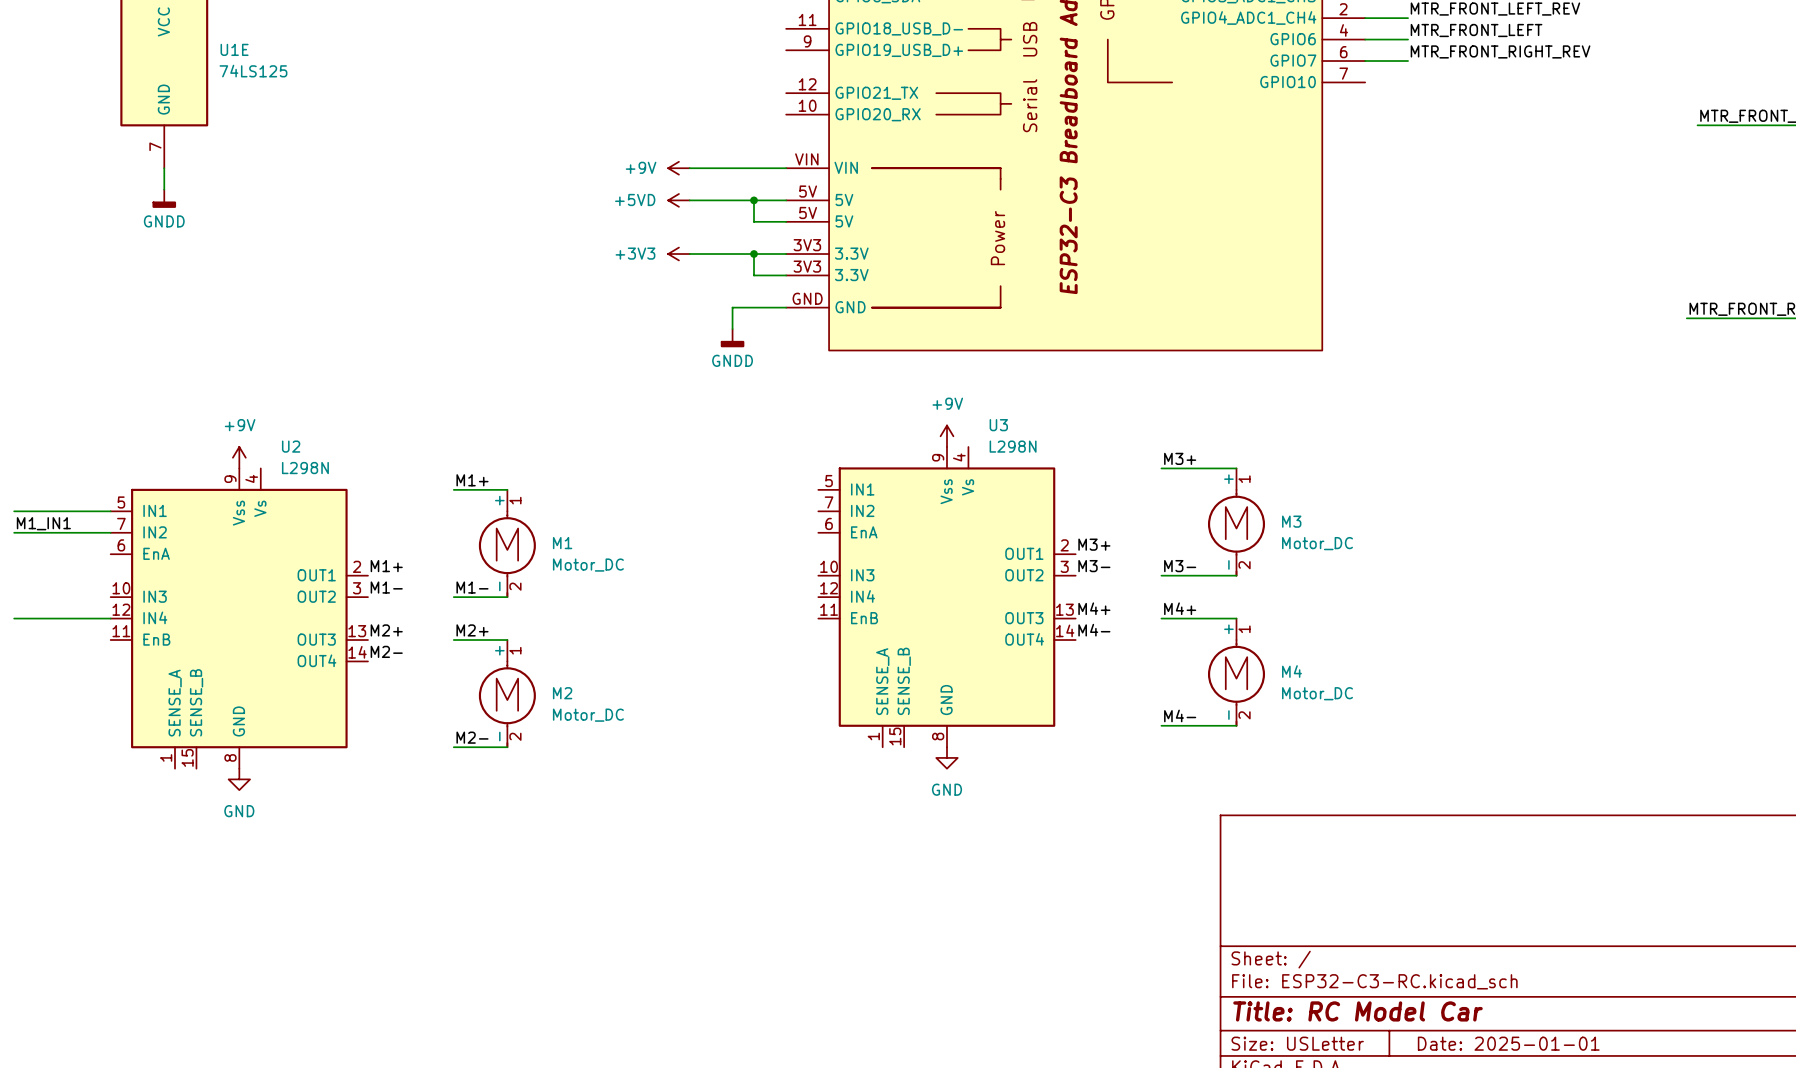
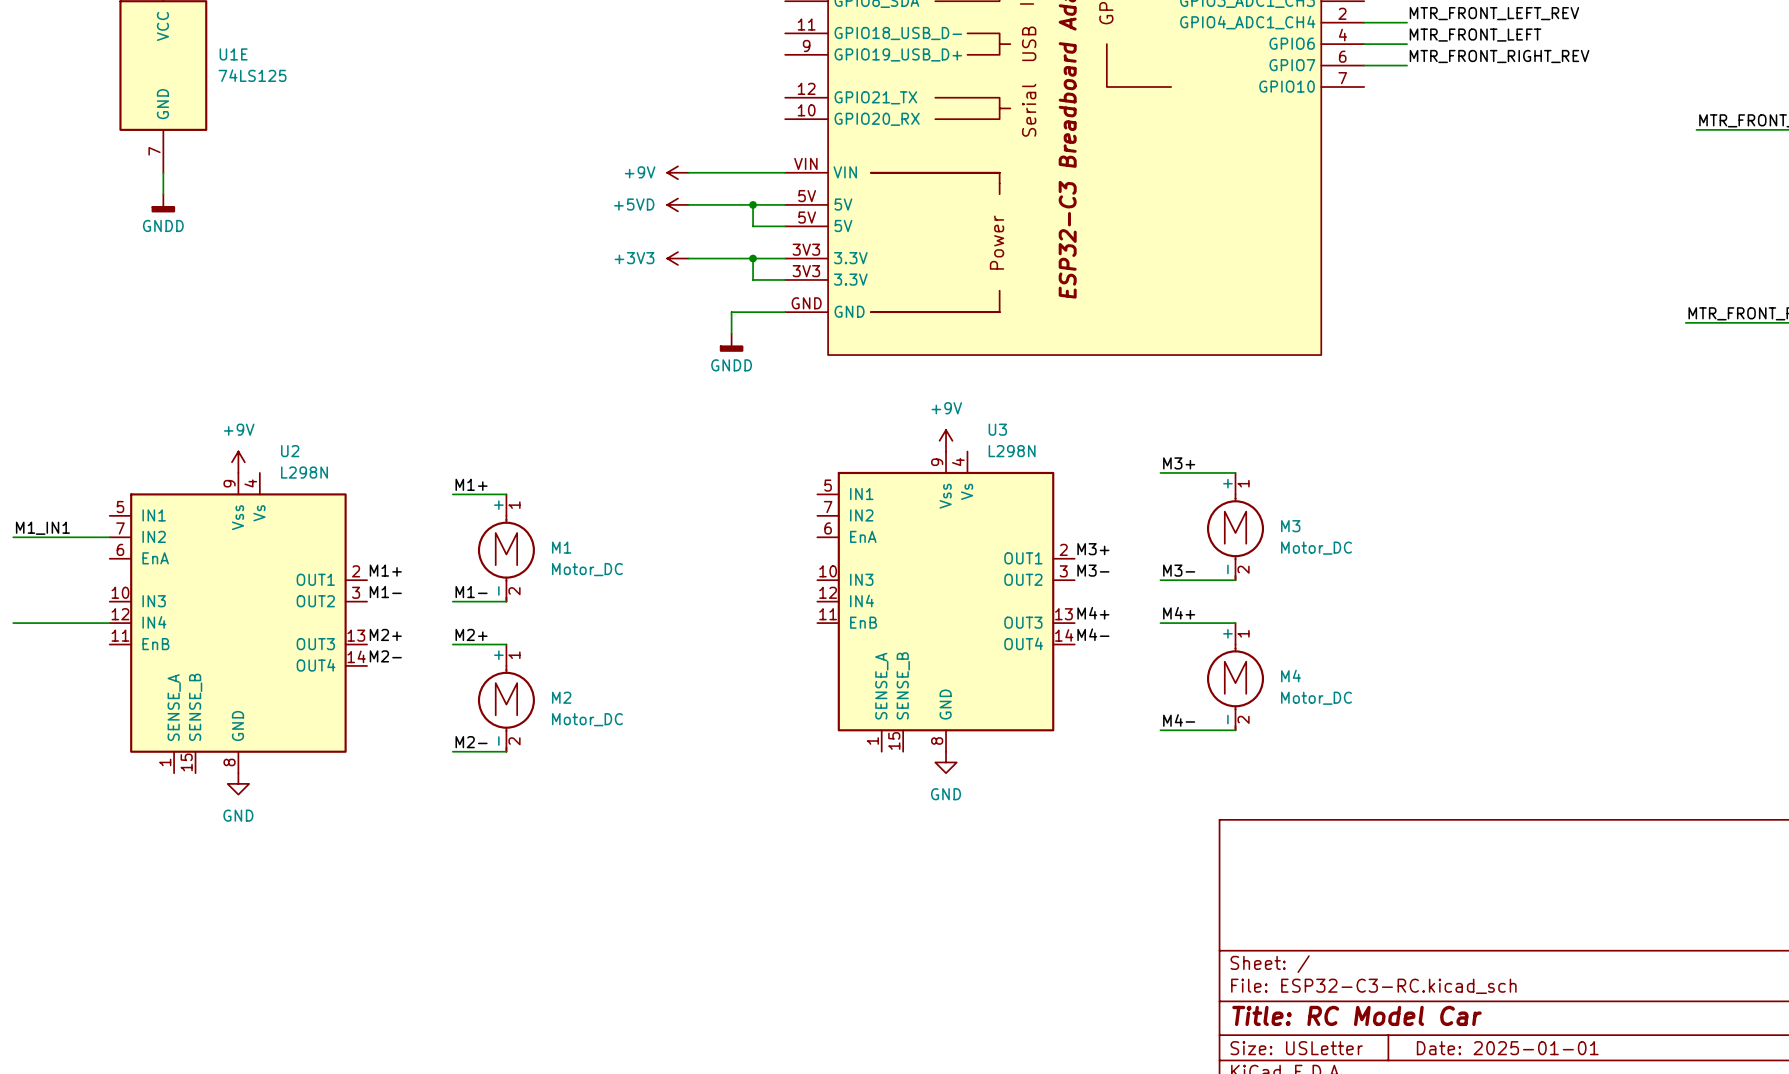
wire: (14, 511) (110, 511) -> none

